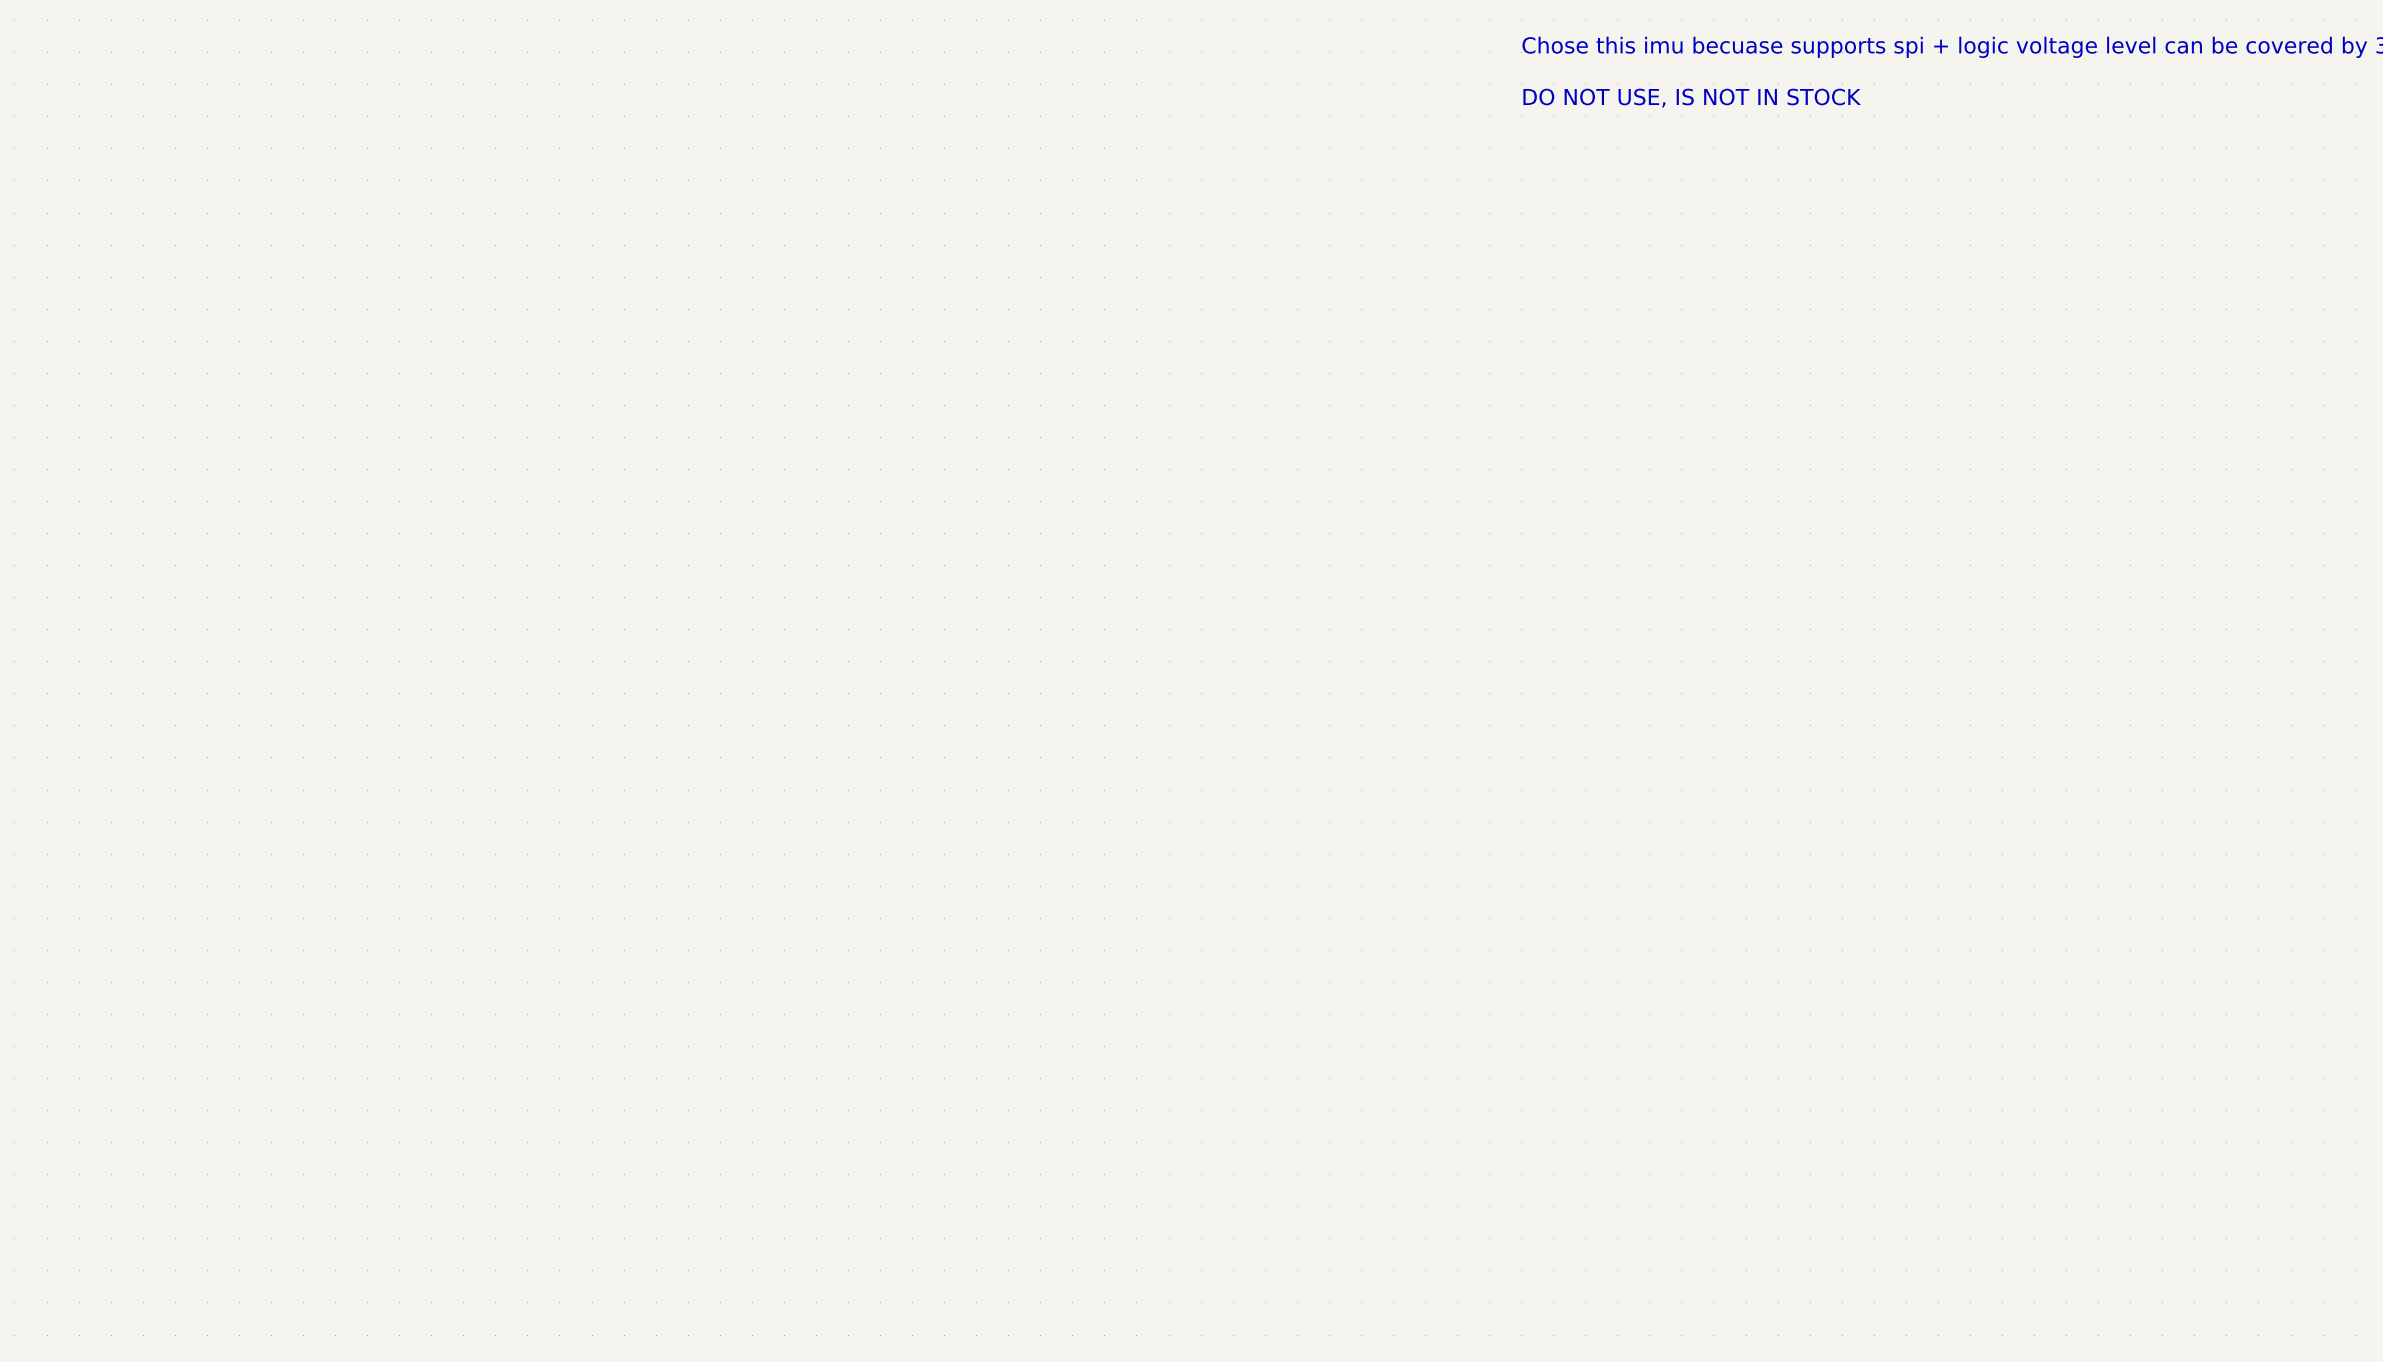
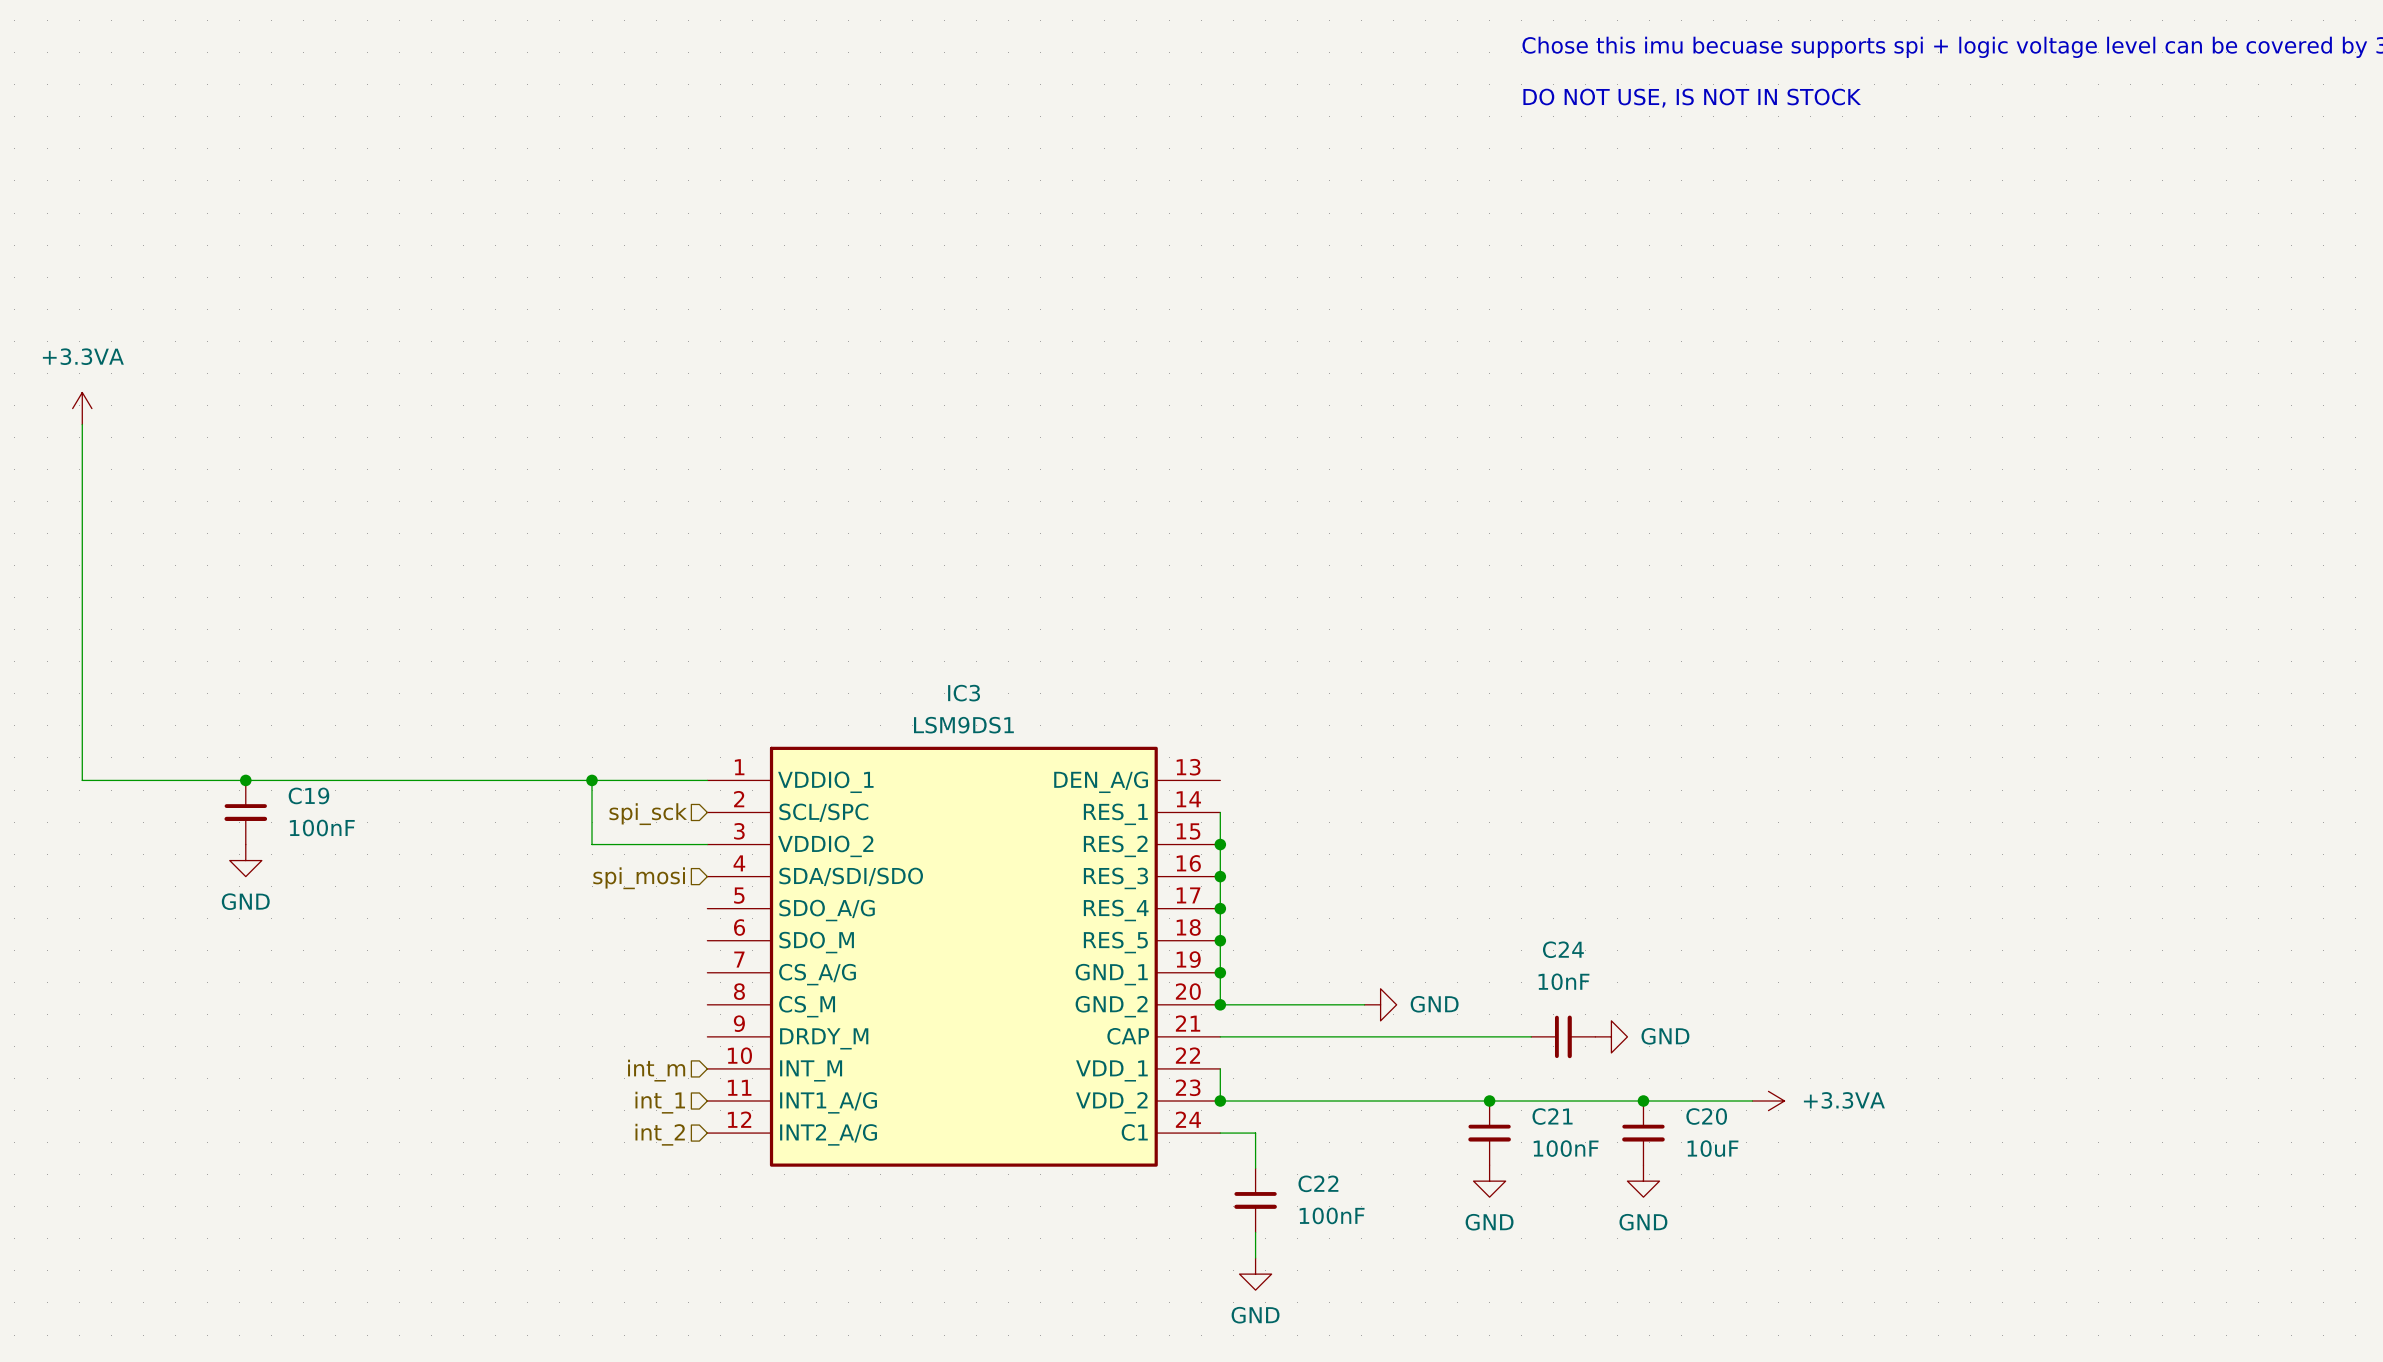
power symbol: none -> +3.3VA (82, 408)
wire: none -> (82, 424) (82, 780) (707, 780)
junction: none -> (245, 780)
wire: none -> (592, 780) (592, 844) (707, 844)
junction: none -> (592, 780)
C19: none -> 100nF (245, 812)
wire: none -> (1220, 812) (1220, 1004) (1364, 1004)
hierarchical label: none -> spi_sck (648, 814)
junction: none -> (1220, 844)
power symbol: none -> GND (245, 860)
junction: none -> (1220, 876)
hierarchical label: none -> spi_mosi (639, 878)
junction: none -> (1220, 908)
junction: none -> (1220, 940)
IC3: none -> LSM9DS1 (963, 956)
junction: none -> (1220, 972)
junction: none -> (1220, 1004)
power symbol: none -> GND (1380, 1004)
wire: none -> (1220, 1036) (1531, 1036)
C24: none -> 10nF (1563, 1036)
power symbol: none -> GND (1611, 1036)
wire: none -> (1220, 1068) (1220, 1101) (1752, 1101)
hierarchical label: none -> int_m (656, 1070)
junction: none -> (1220, 1101)
junction: none -> (1489, 1101)
junction: none -> (1643, 1101)
power symbol: none -> +3.3VA (1768, 1101)
hierarchical label: none -> int_1 (660, 1102)
wire: none -> (1220, 1133) (1255, 1133) (1255, 1168)
C21: none -> 100nF (1489, 1133)
C20: none -> 10uF (1643, 1133)
hierarchical label: none -> int_2 (660, 1134)
power symbol: none -> GND (1489, 1181)
power symbol: none -> GND (1643, 1181)
C22: none -> 100nF (1255, 1200)
wire: none -> (1255, 1232) (1255, 1258)
power symbol: none -> GND (1255, 1274)

